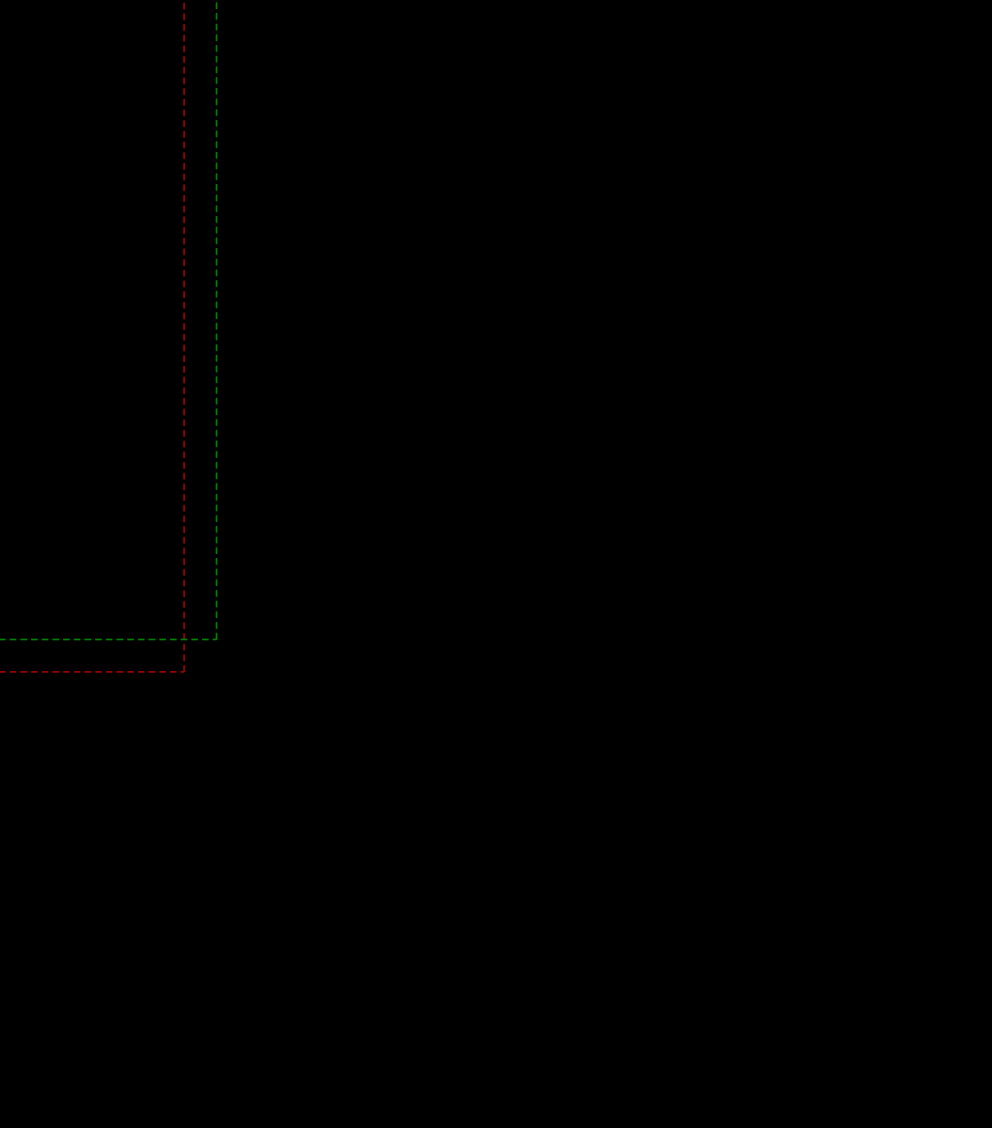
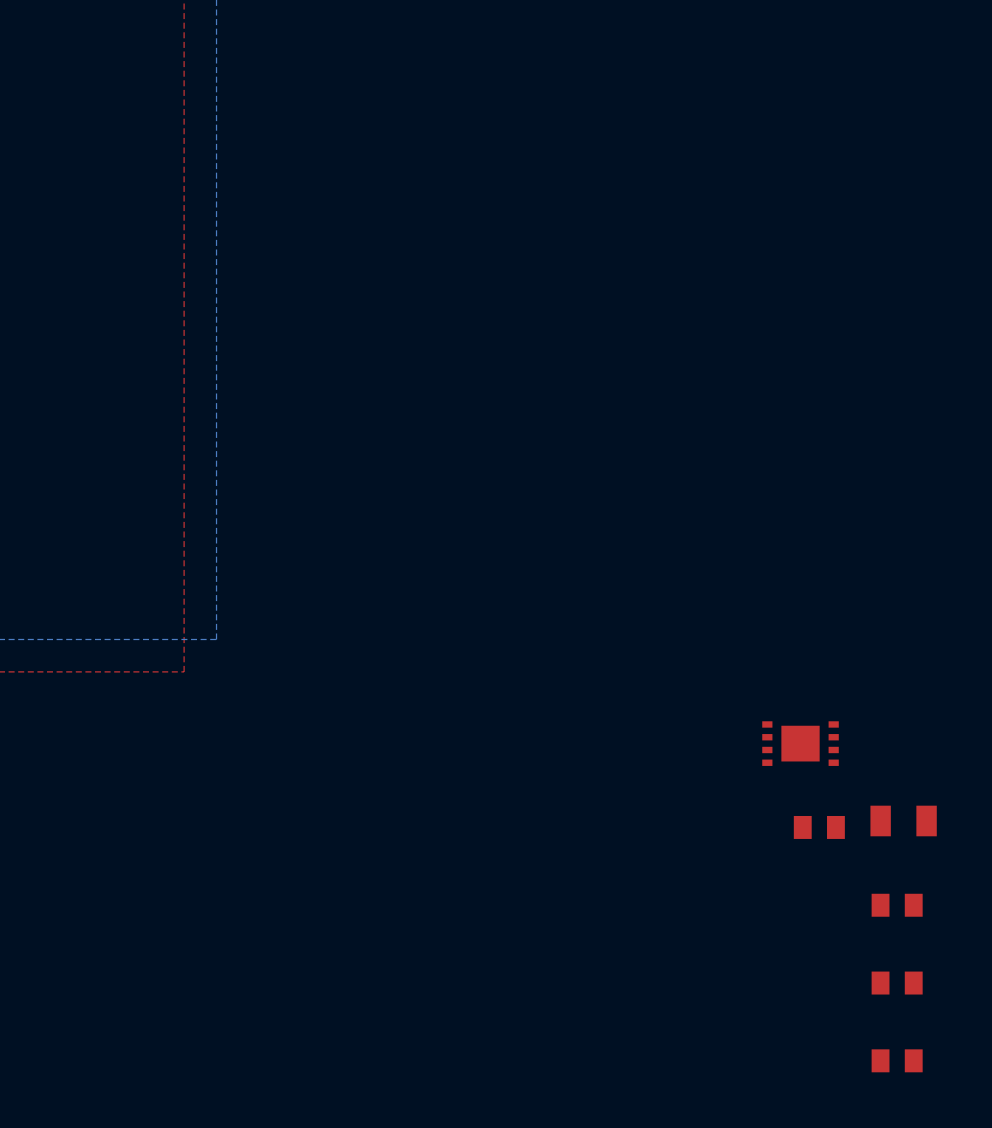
part: none -> (800, 743)
part: none -> (903, 820)
part: none -> (819, 827)
part: none -> (897, 905)
part: none -> (897, 983)
part: none -> (897, 1060)

